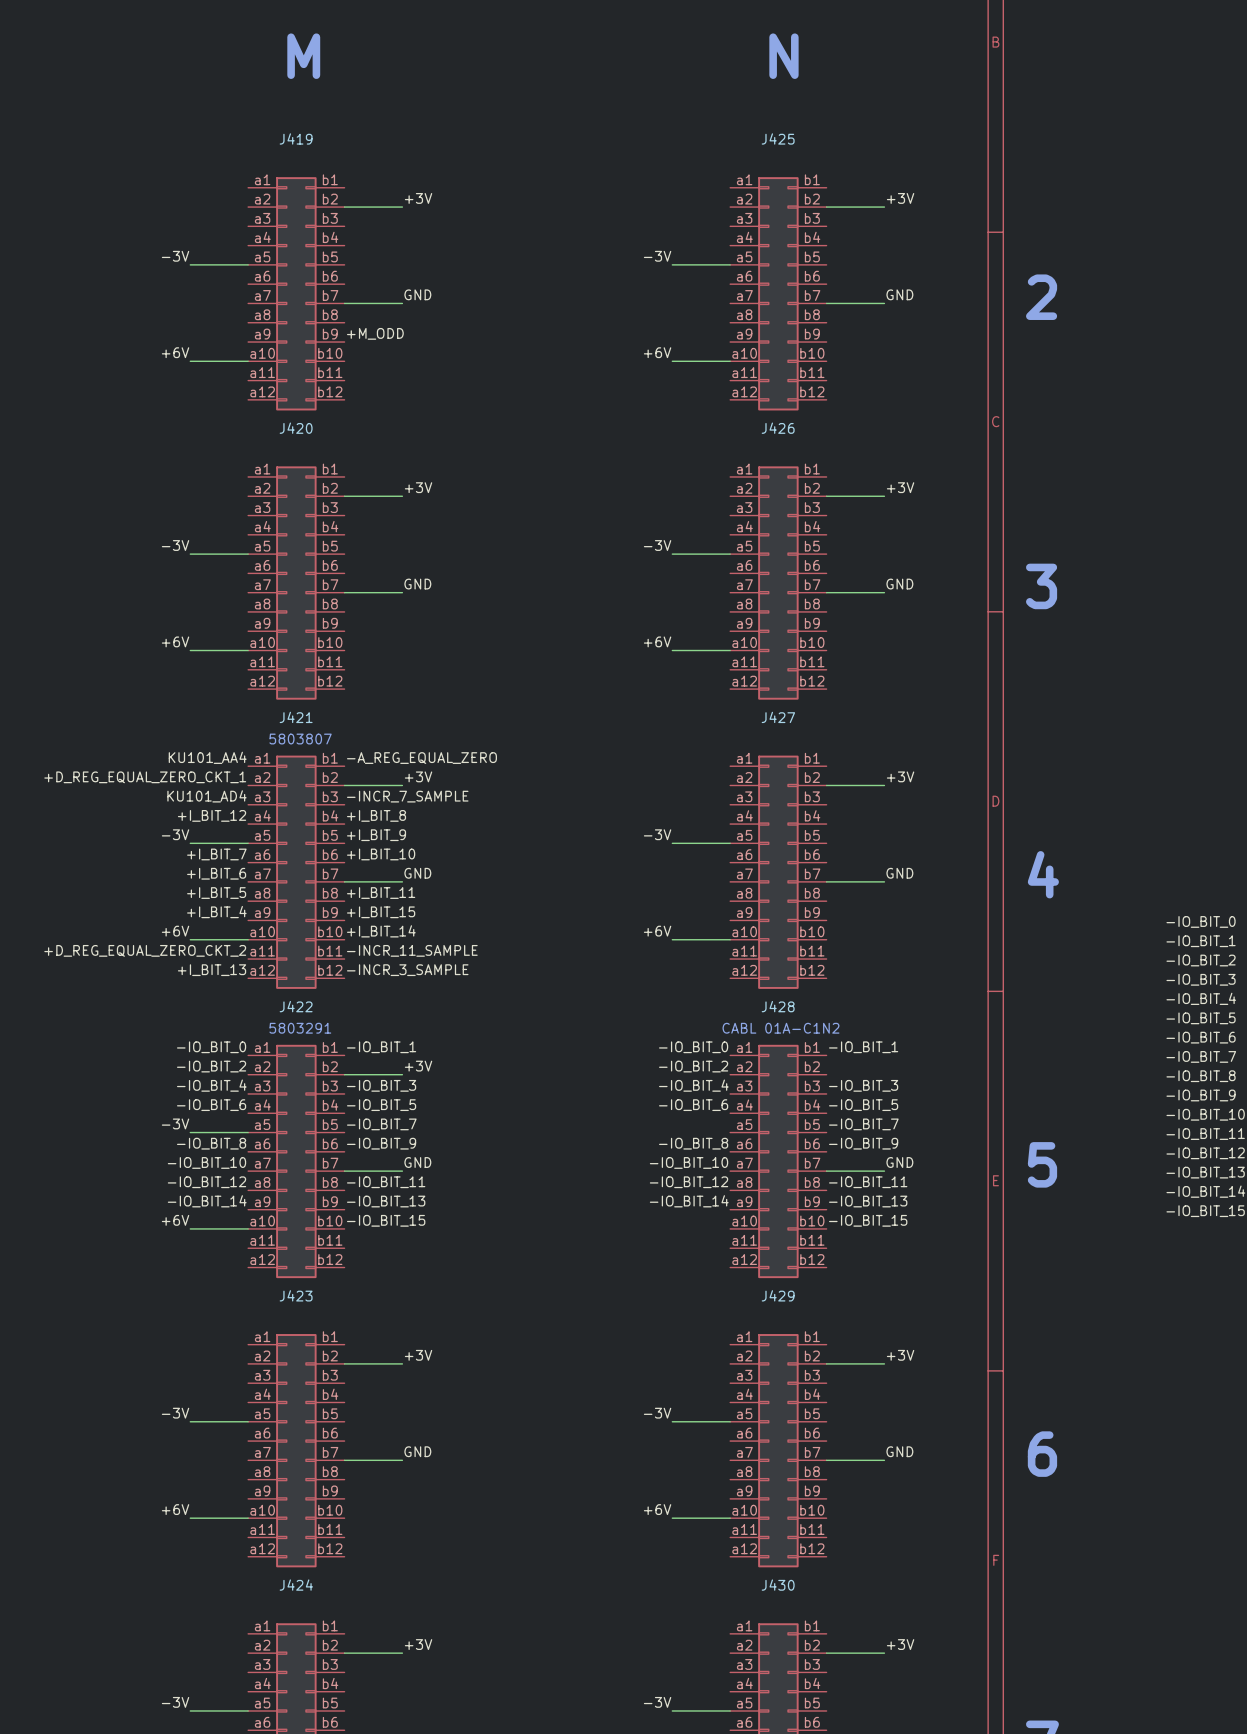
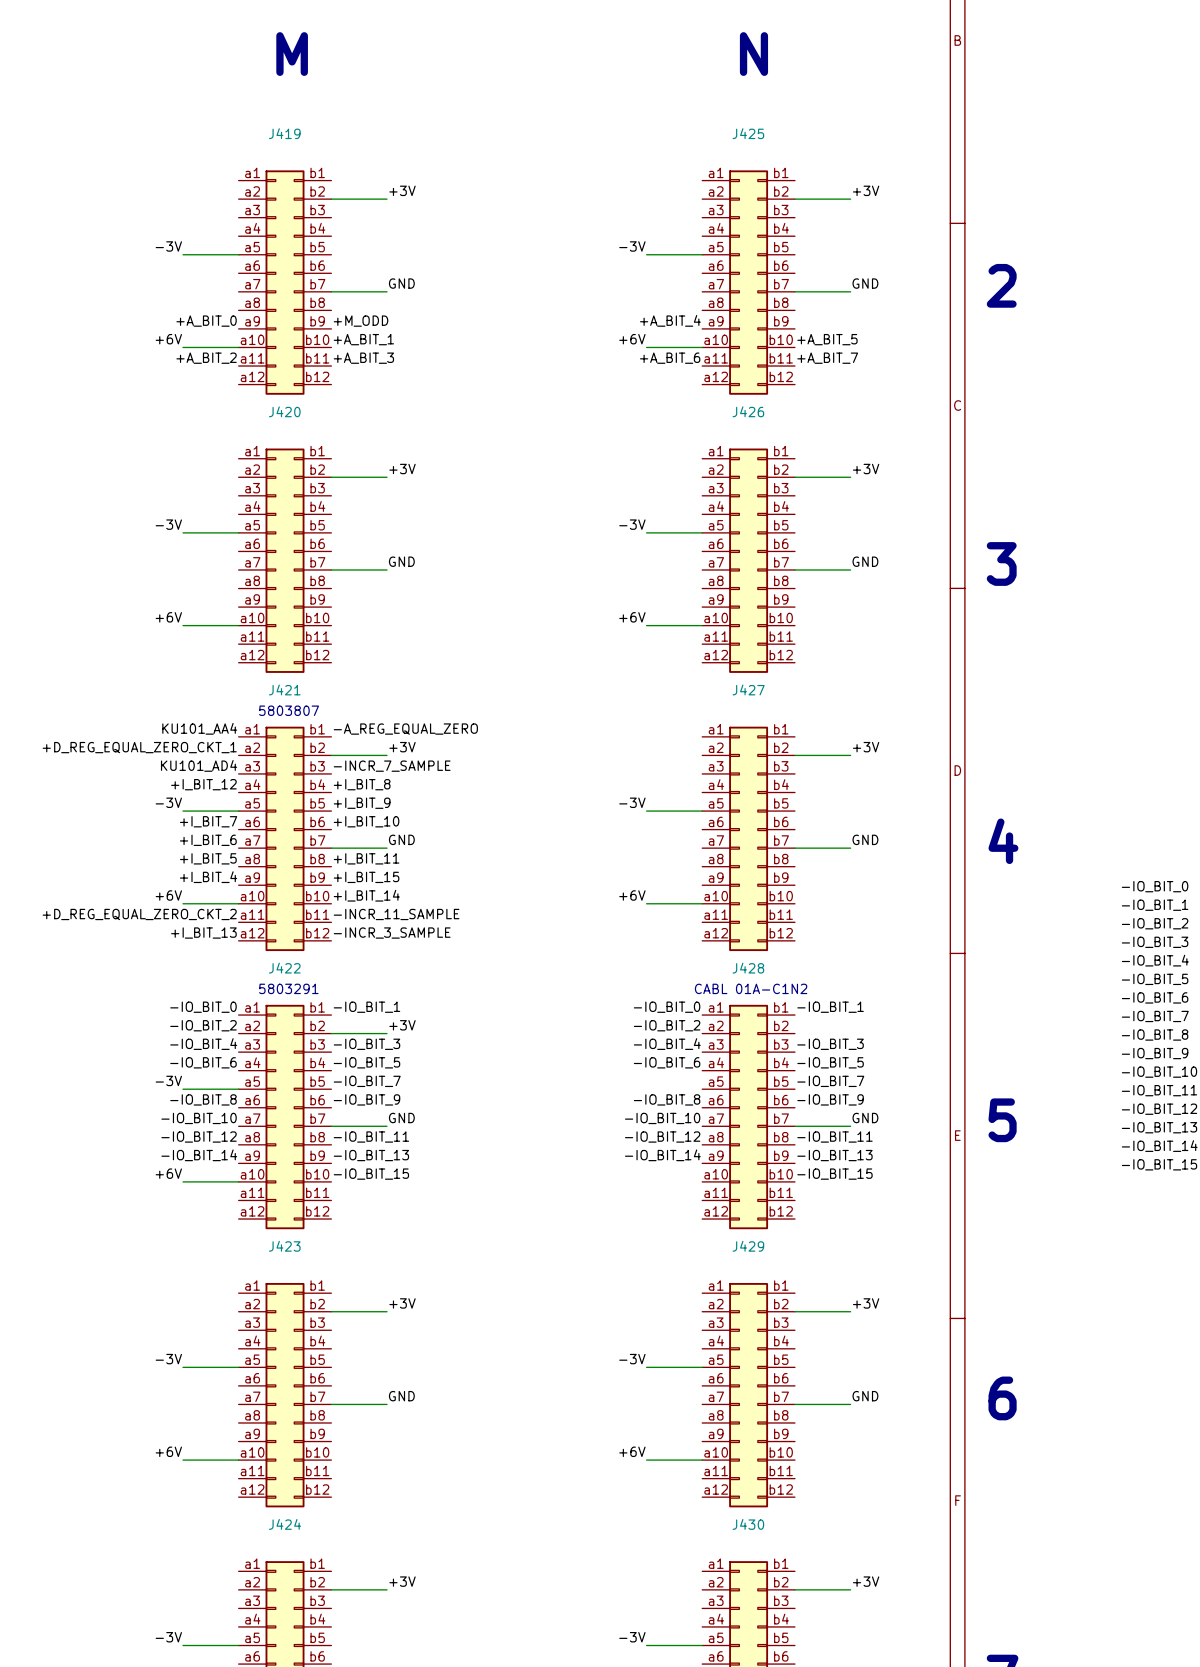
label: none -> +A_BIT_0 (206, 321)
label: none -> +A_BIT_4 (670, 320)
label: none -> +A_BIT_1 (363, 339)
label: none -> +A_BIT_5 (827, 339)
label: none -> +A_BIT_2 (206, 358)
label: none -> +A_BIT_3 (363, 358)
label: none -> +A_BIT_6 (670, 358)
label: none -> +A_BIT_7 (827, 358)

